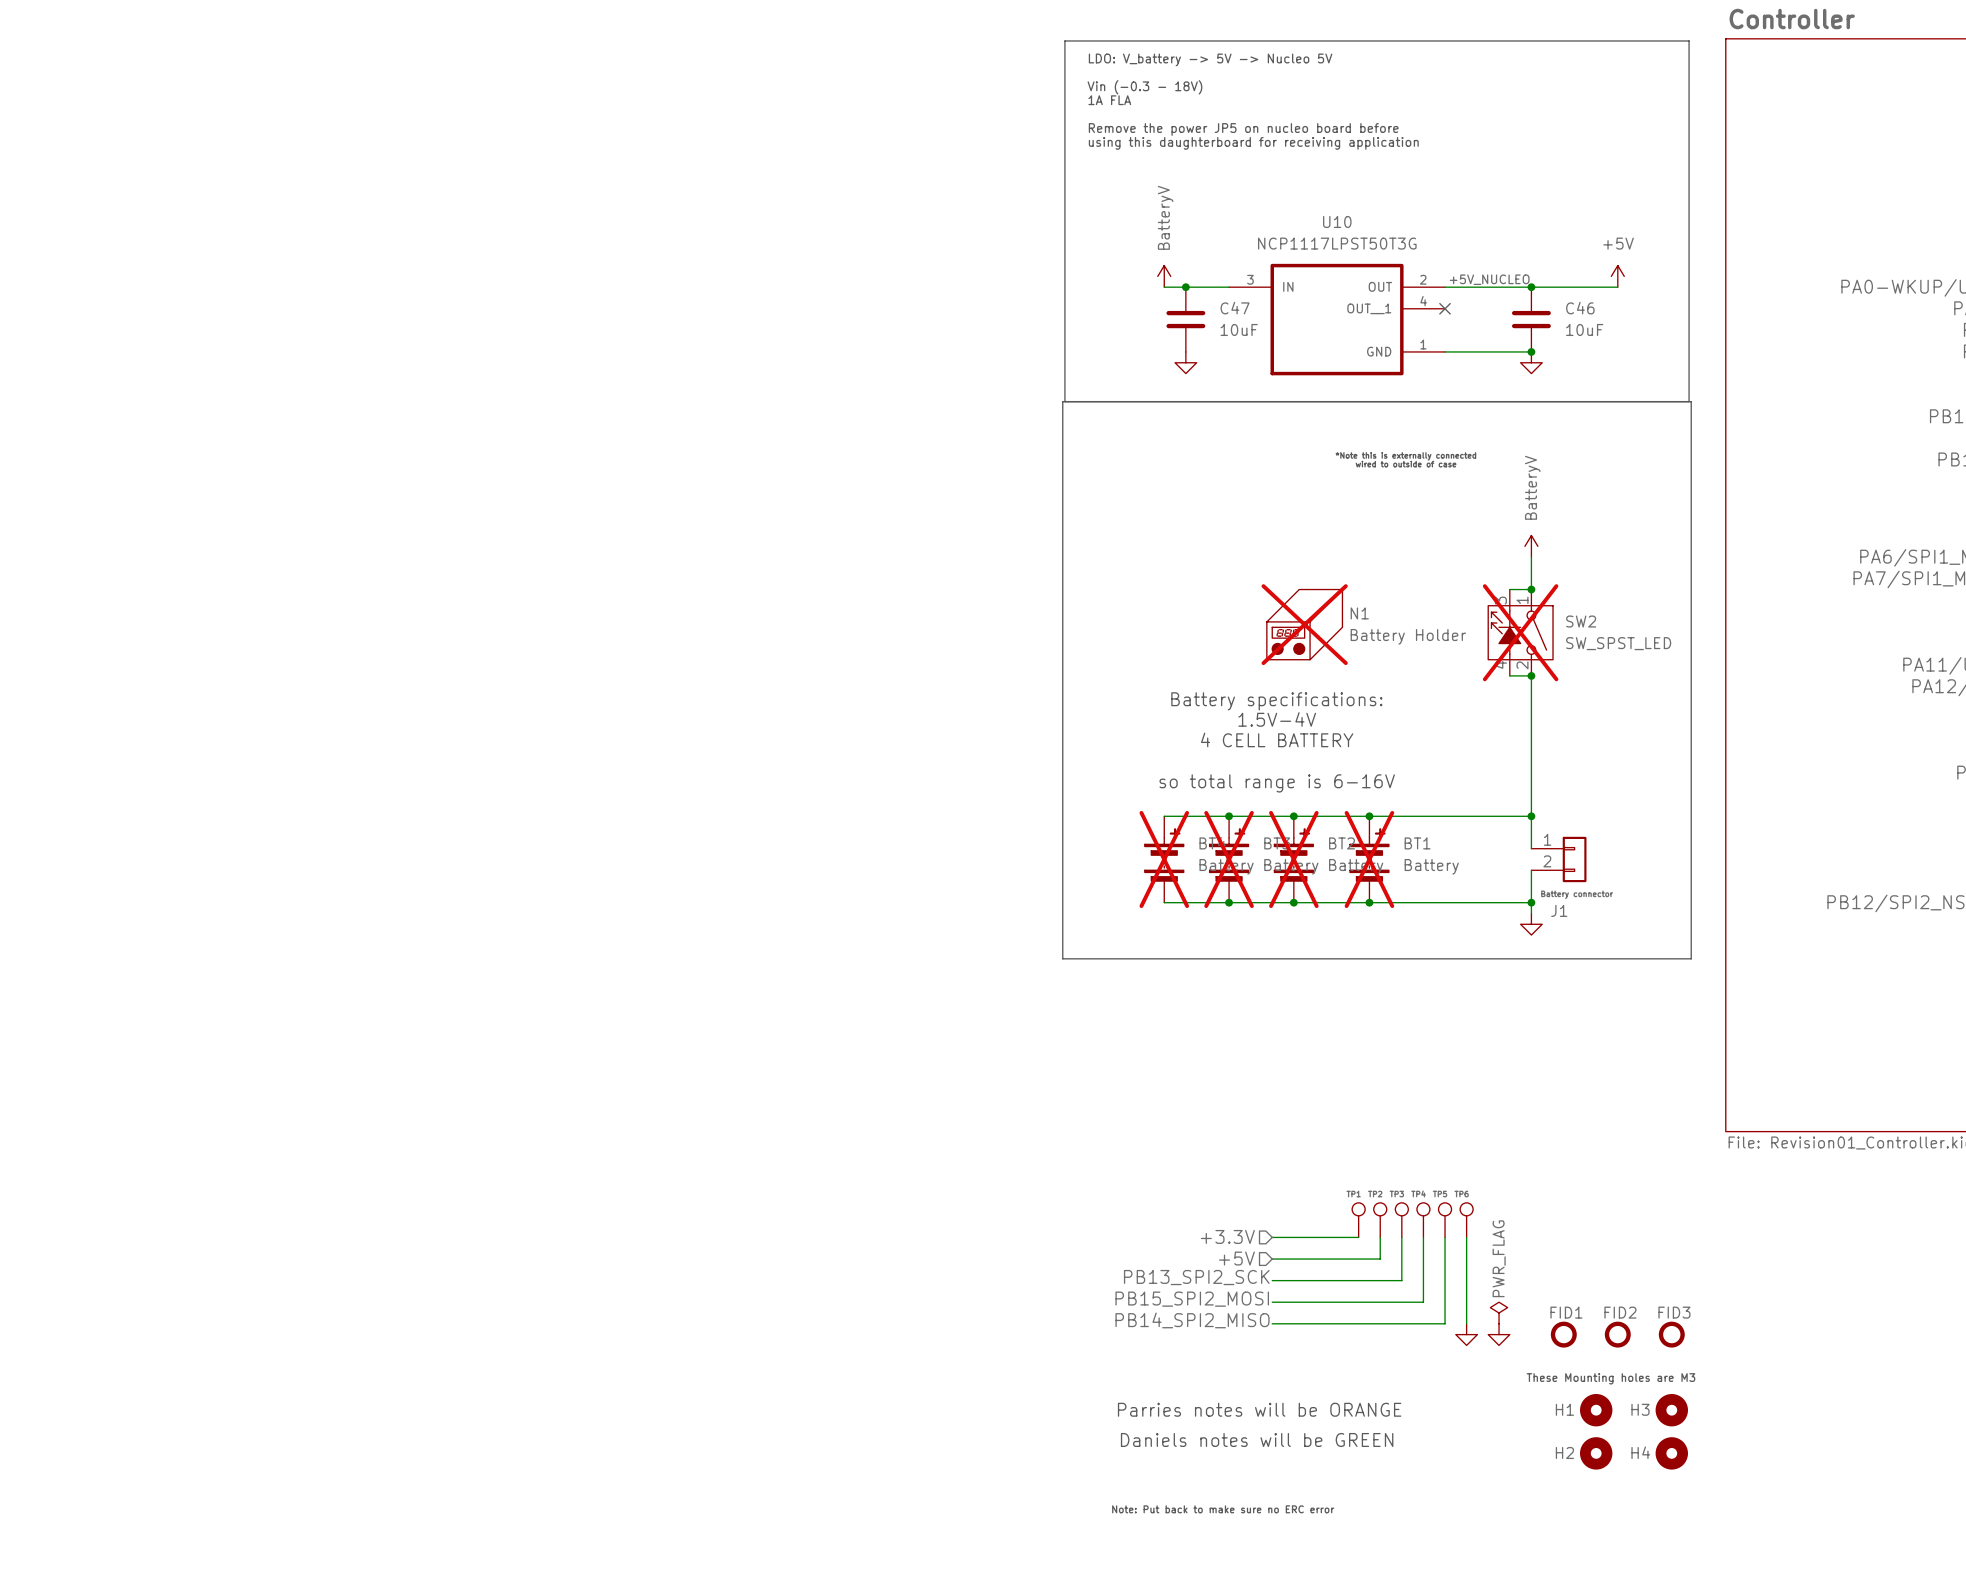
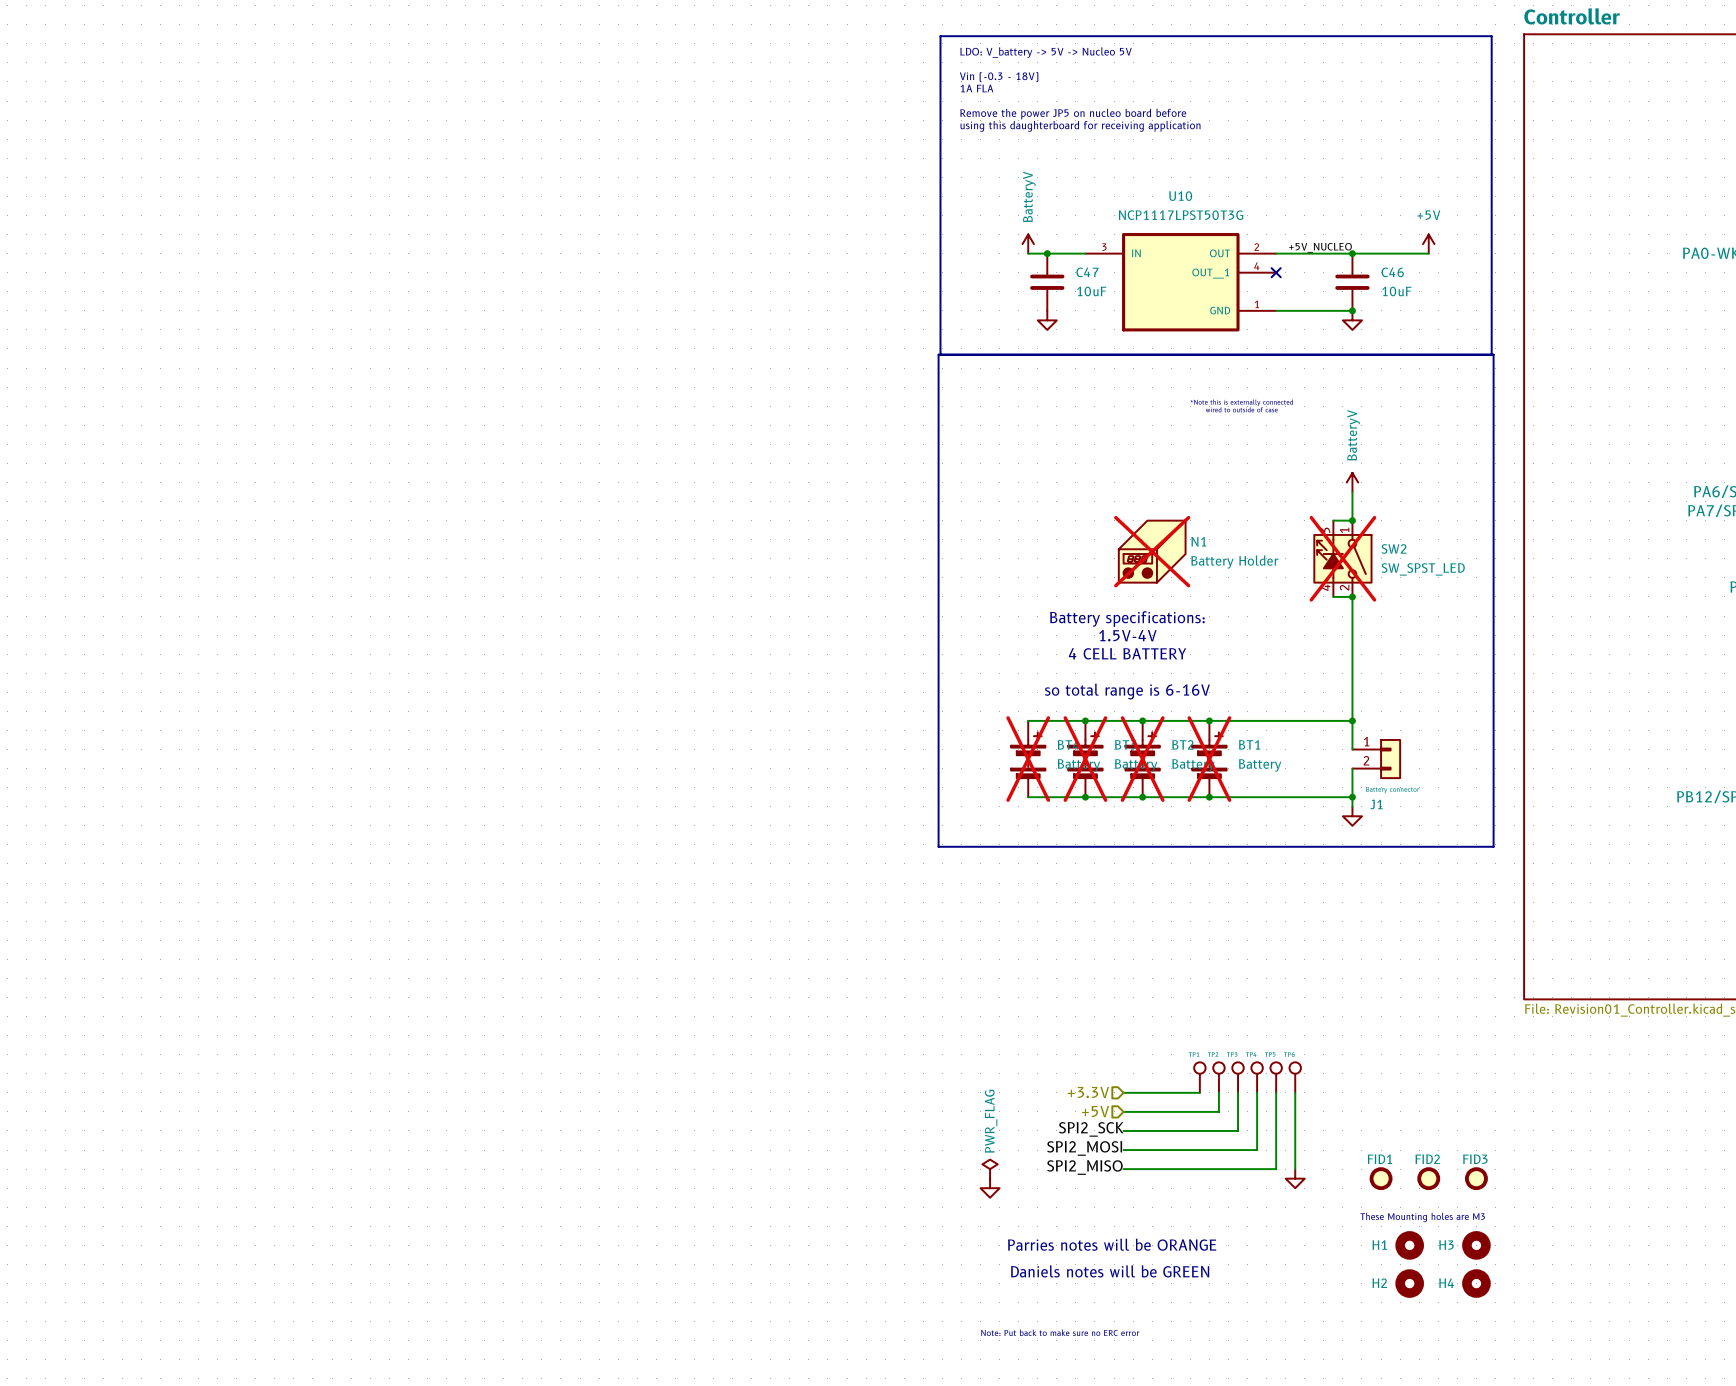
label: PB13_SPI2_SCK (1196, 1277) -> SPI2_SCK (1091, 1129)
label: PB15_SPI2_MOSI (1192, 1299) -> SPI2_MOSI (1084, 1148)
power symbol: PWR_FLAG (1499, 1313) -> none
label: PB14_SPI2_MISO (1192, 1320) -> SPI2_MISO (1084, 1167)
power symbol: none -> PWR_FLAG (990, 1169)
power symbol: (1499, 1334) -> none
power symbol: none -> (990, 1188)

